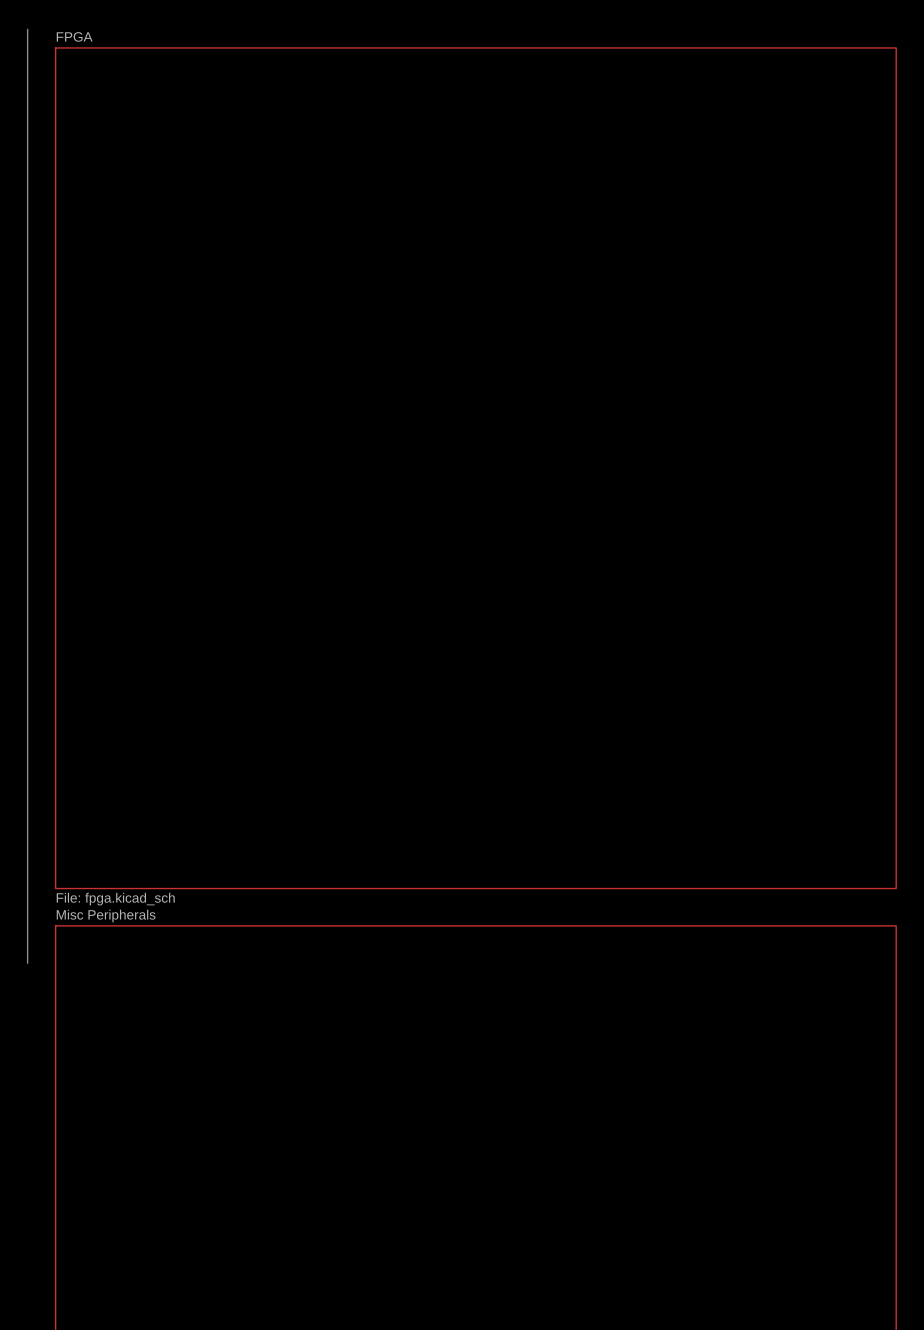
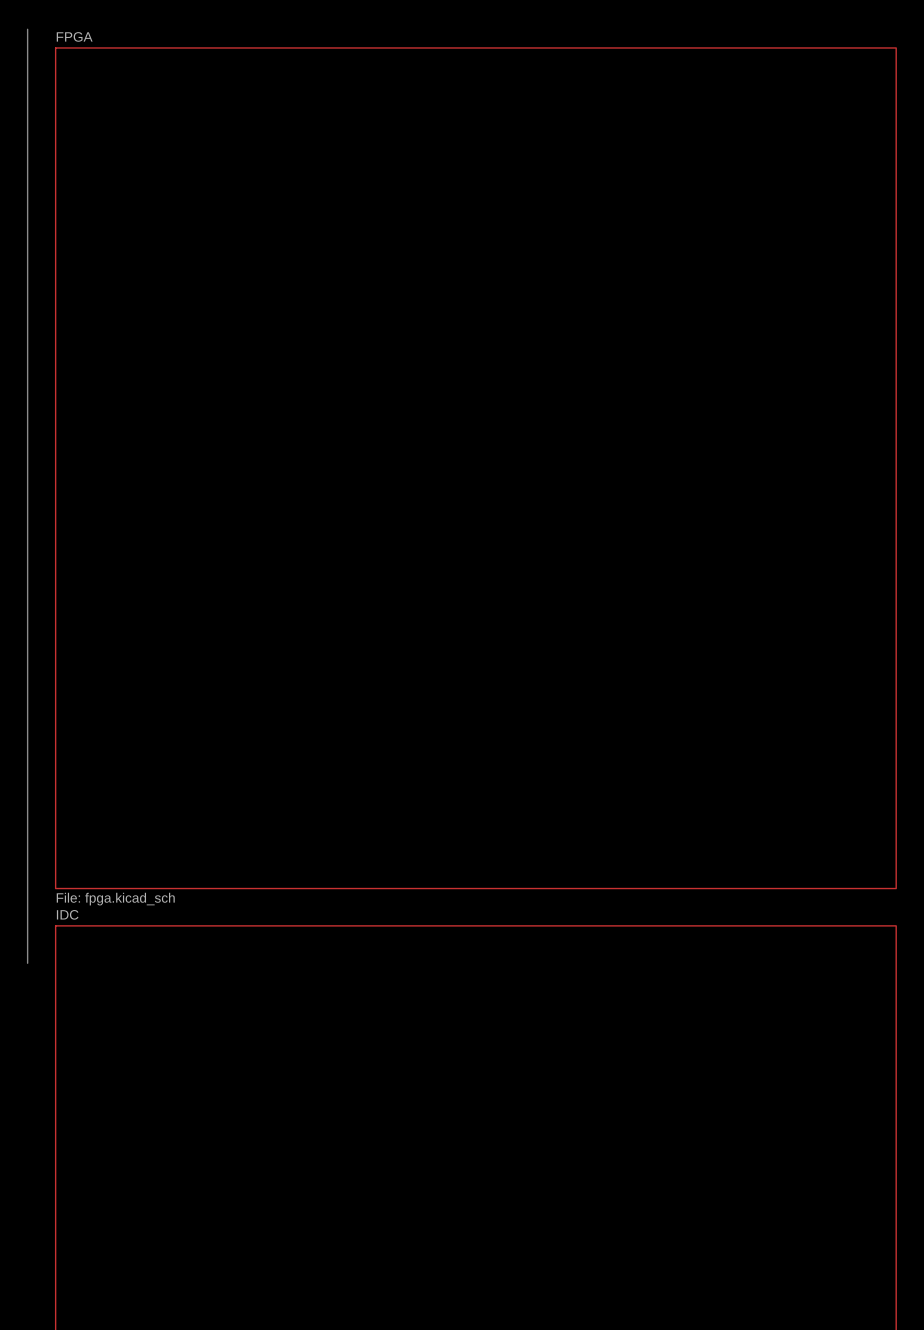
sheet Misc Peripherals name: Misc Peripherals (106, 916) -> IDC (67, 914)

